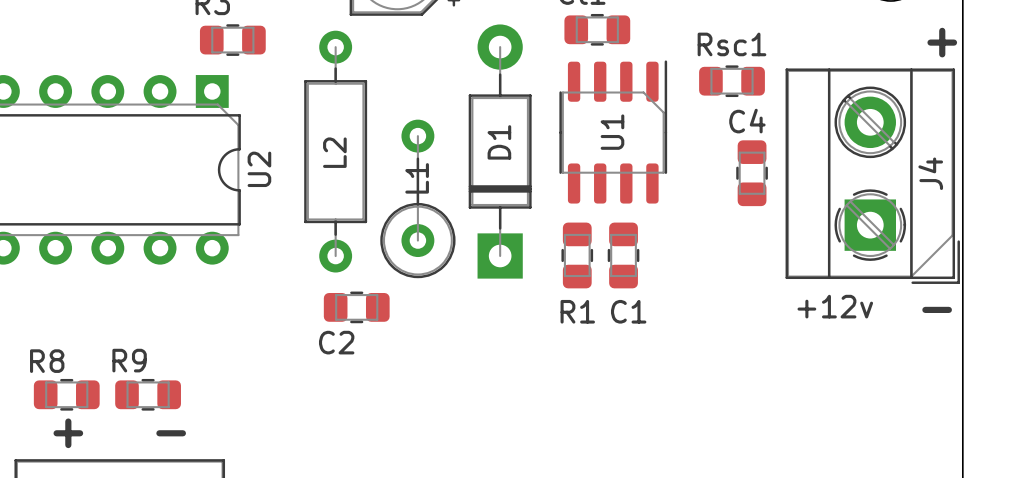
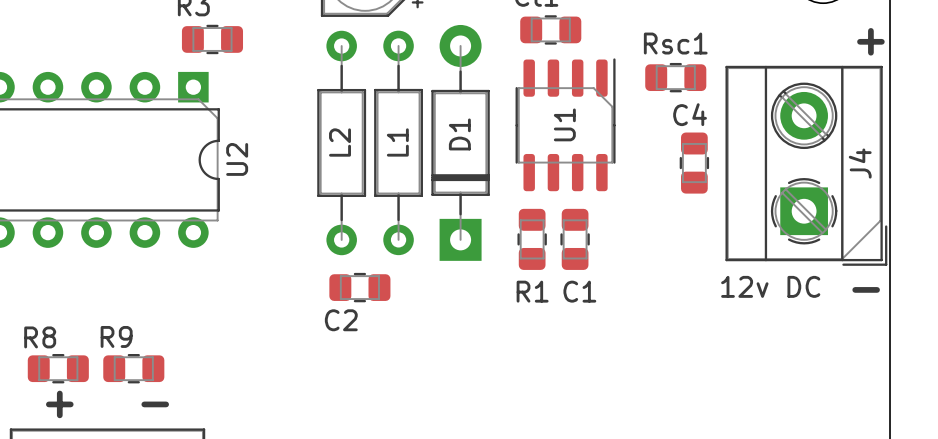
L2 footprint: [304, 30, 368, 273] -> [317, 30, 367, 256]
L1 footprint: [380, 119, 456, 279] -> [374, 30, 423, 256]
J4 value: +12v (835, 306) -> 12v DC (770, 286)
C2 position: (356, 307) -> (359, 287)

